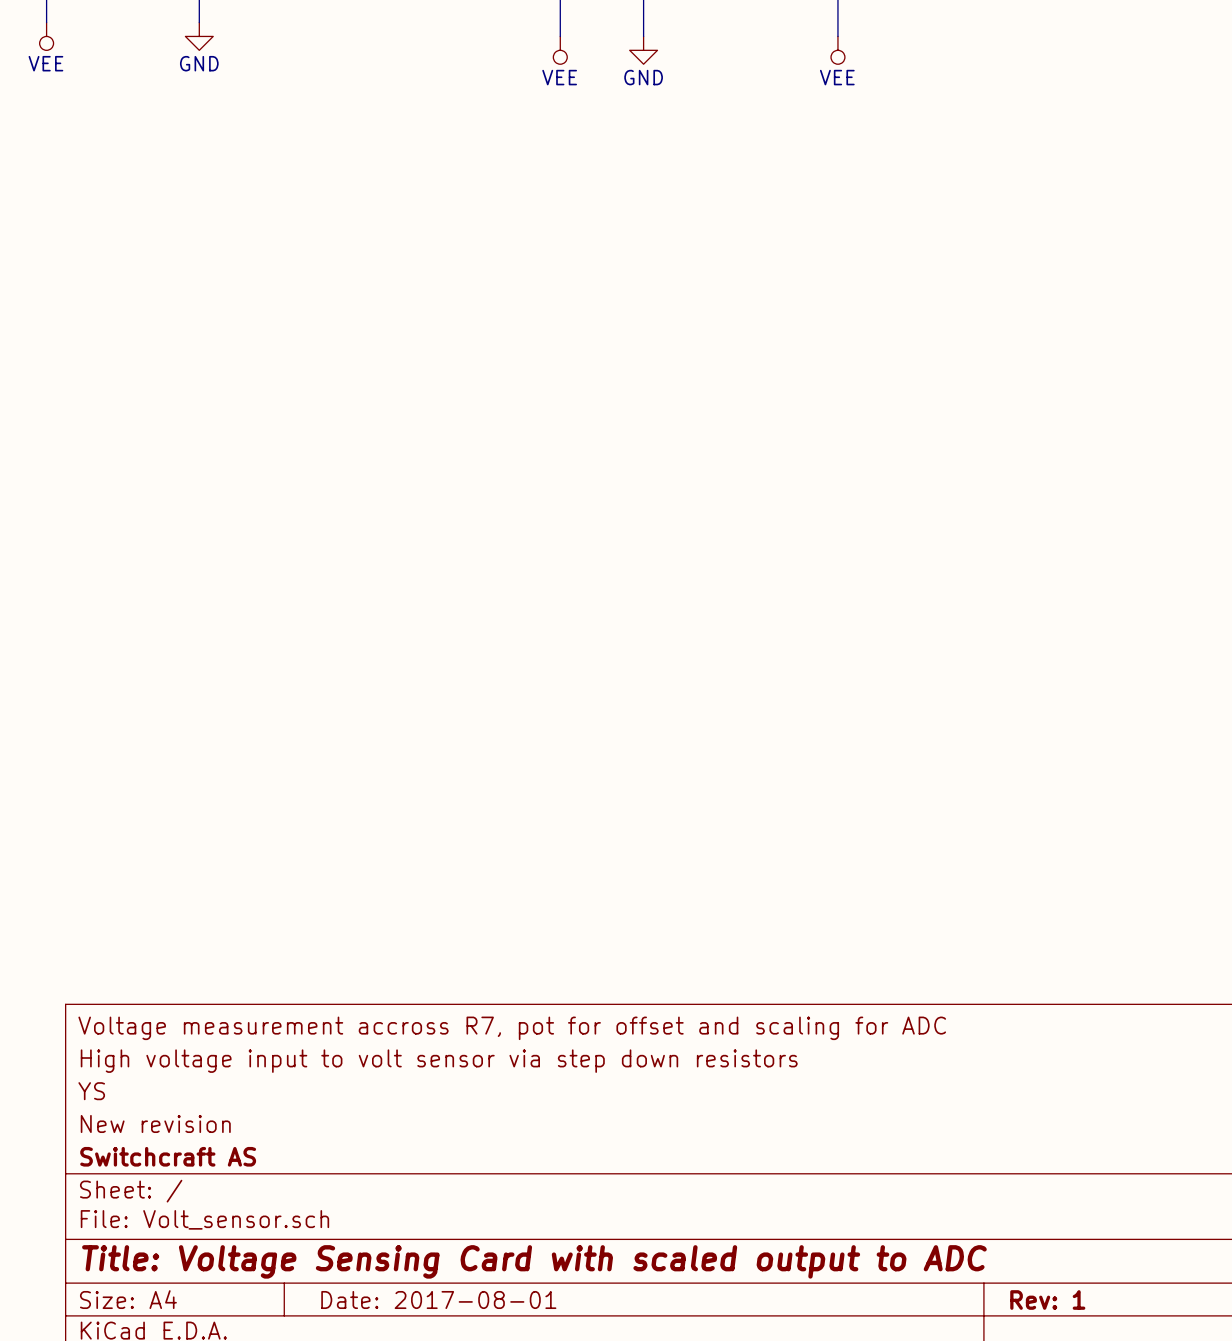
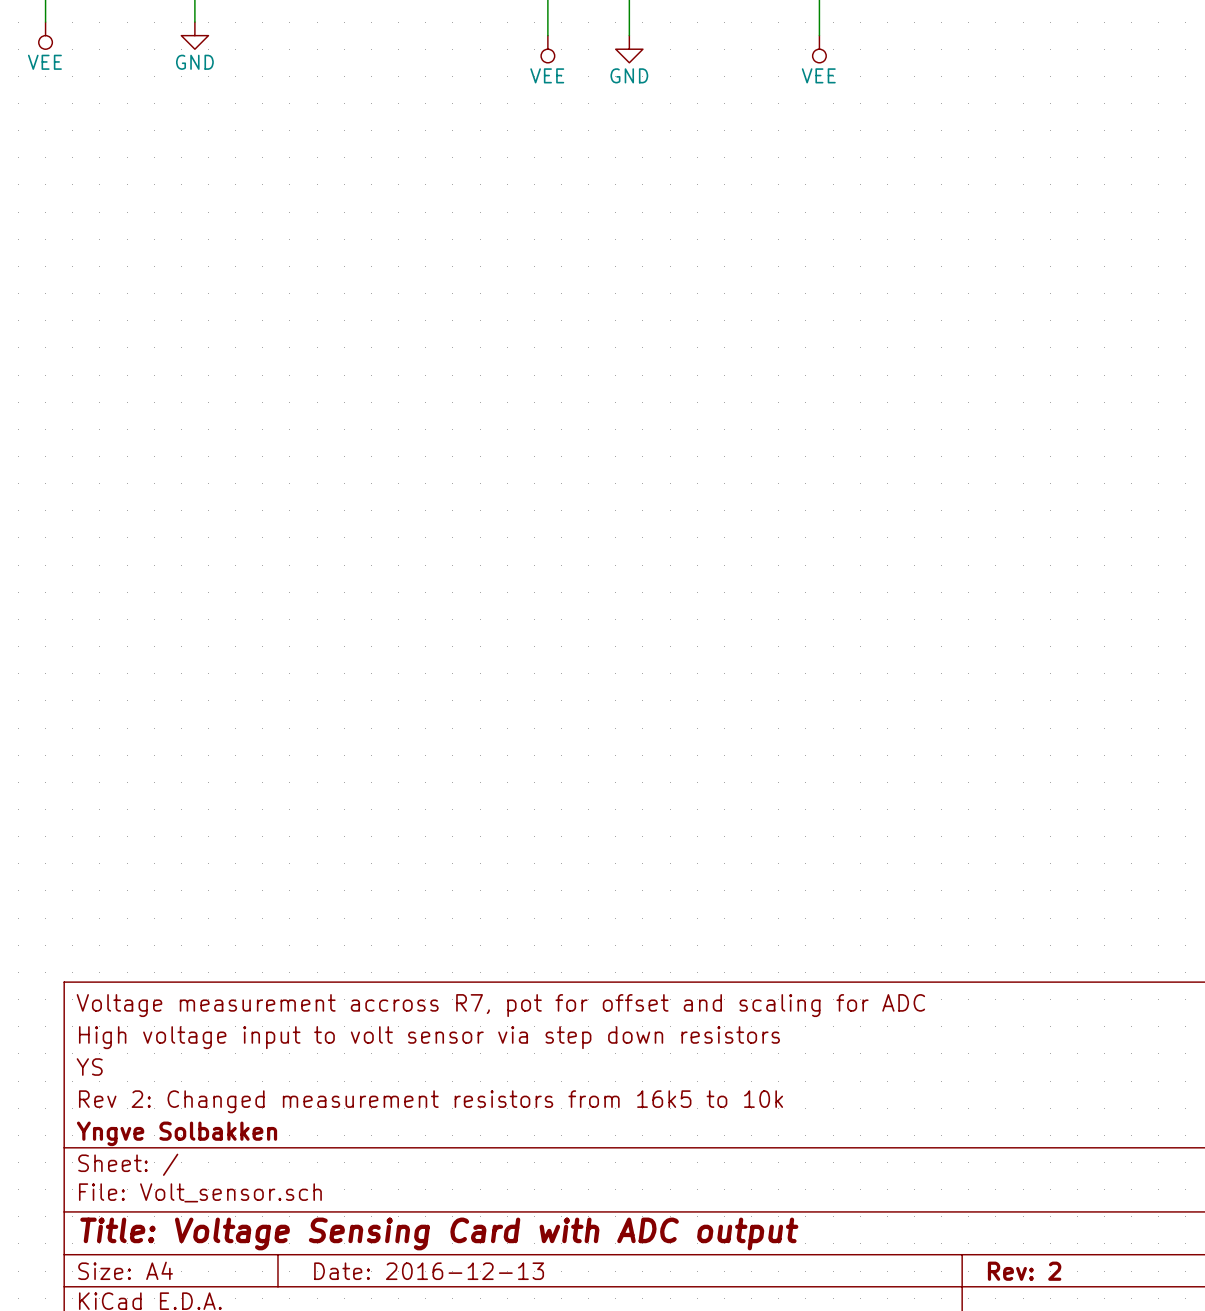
title block: New revision (155, 1123) -> Rev 2: Changed measurement resistors from 16k5 to 10k (431, 1101)
title block: Switchcraft AS (168, 1156) -> Yngve Solbakken (177, 1133)
title block: Title: Voltage Sensing Card with scaled output to ADC (534, 1261) -> Title: Voltage Sensing Card with ADC output (439, 1233)
title block: Date: 2017-08-01 (438, 1299) -> Date: 2016-12-13 (429, 1271)
title block: Rev: 1 (1047, 1299) -> Rev: 2 (1024, 1271)

